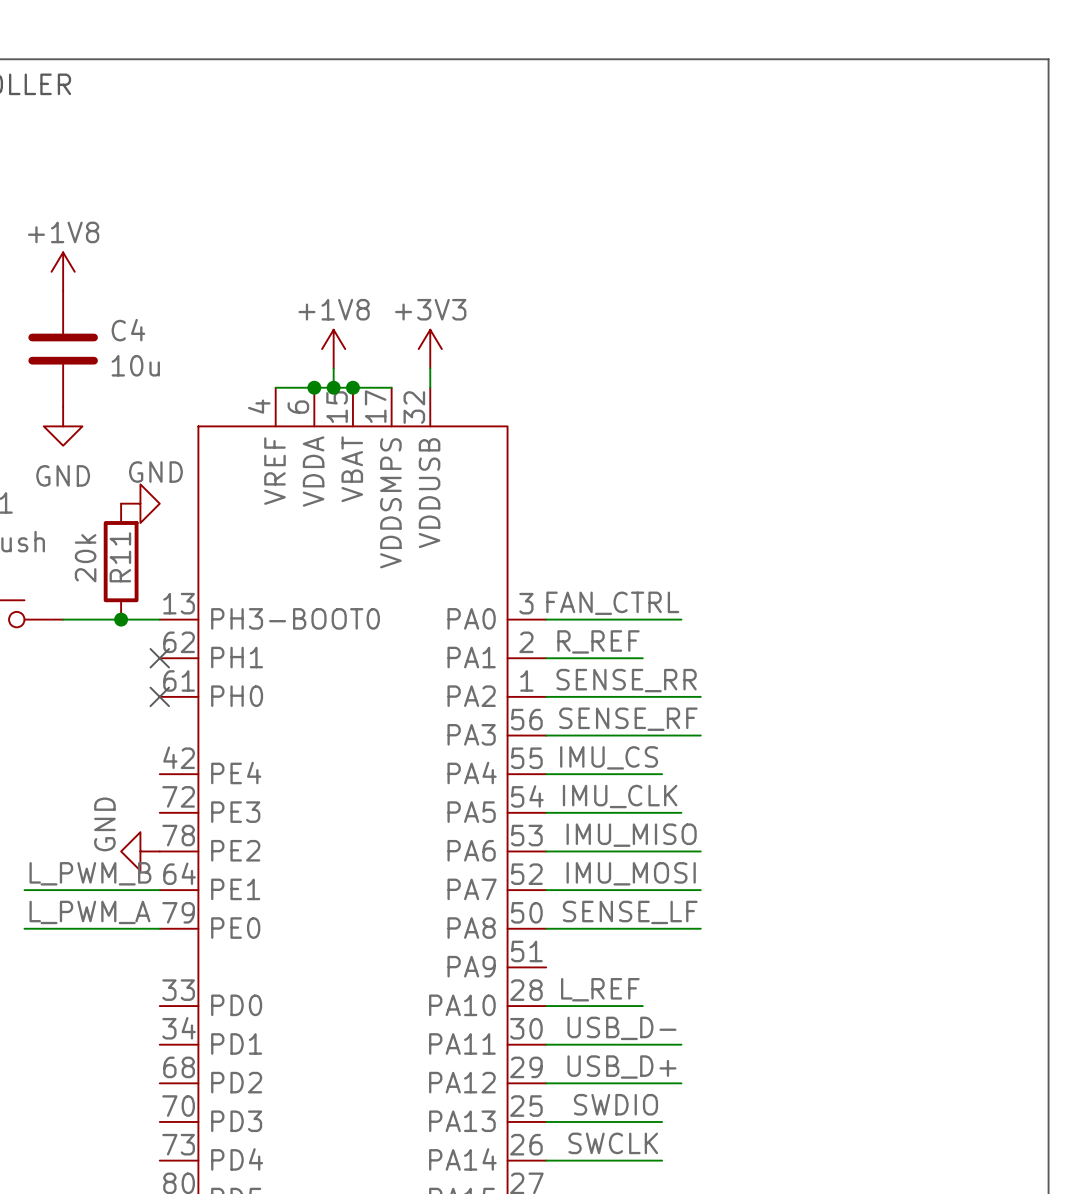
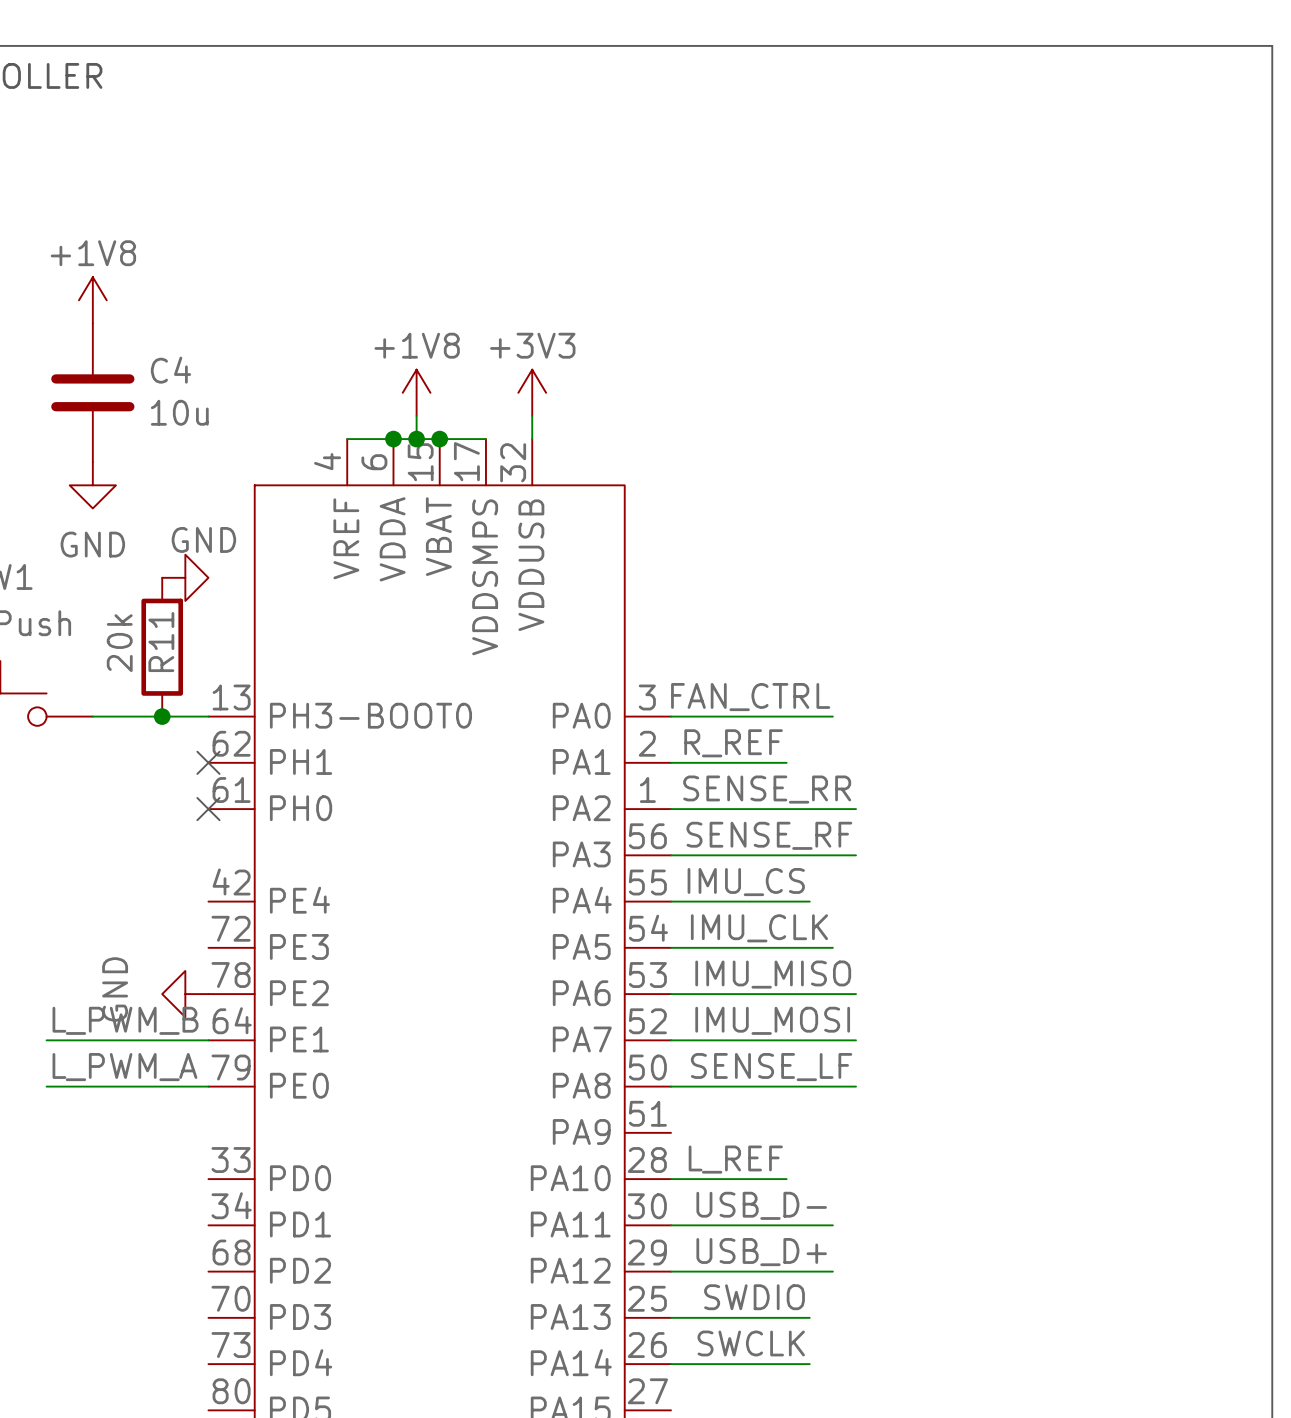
power symbol text position: GND (104, 824) -> GND (115, 989)

